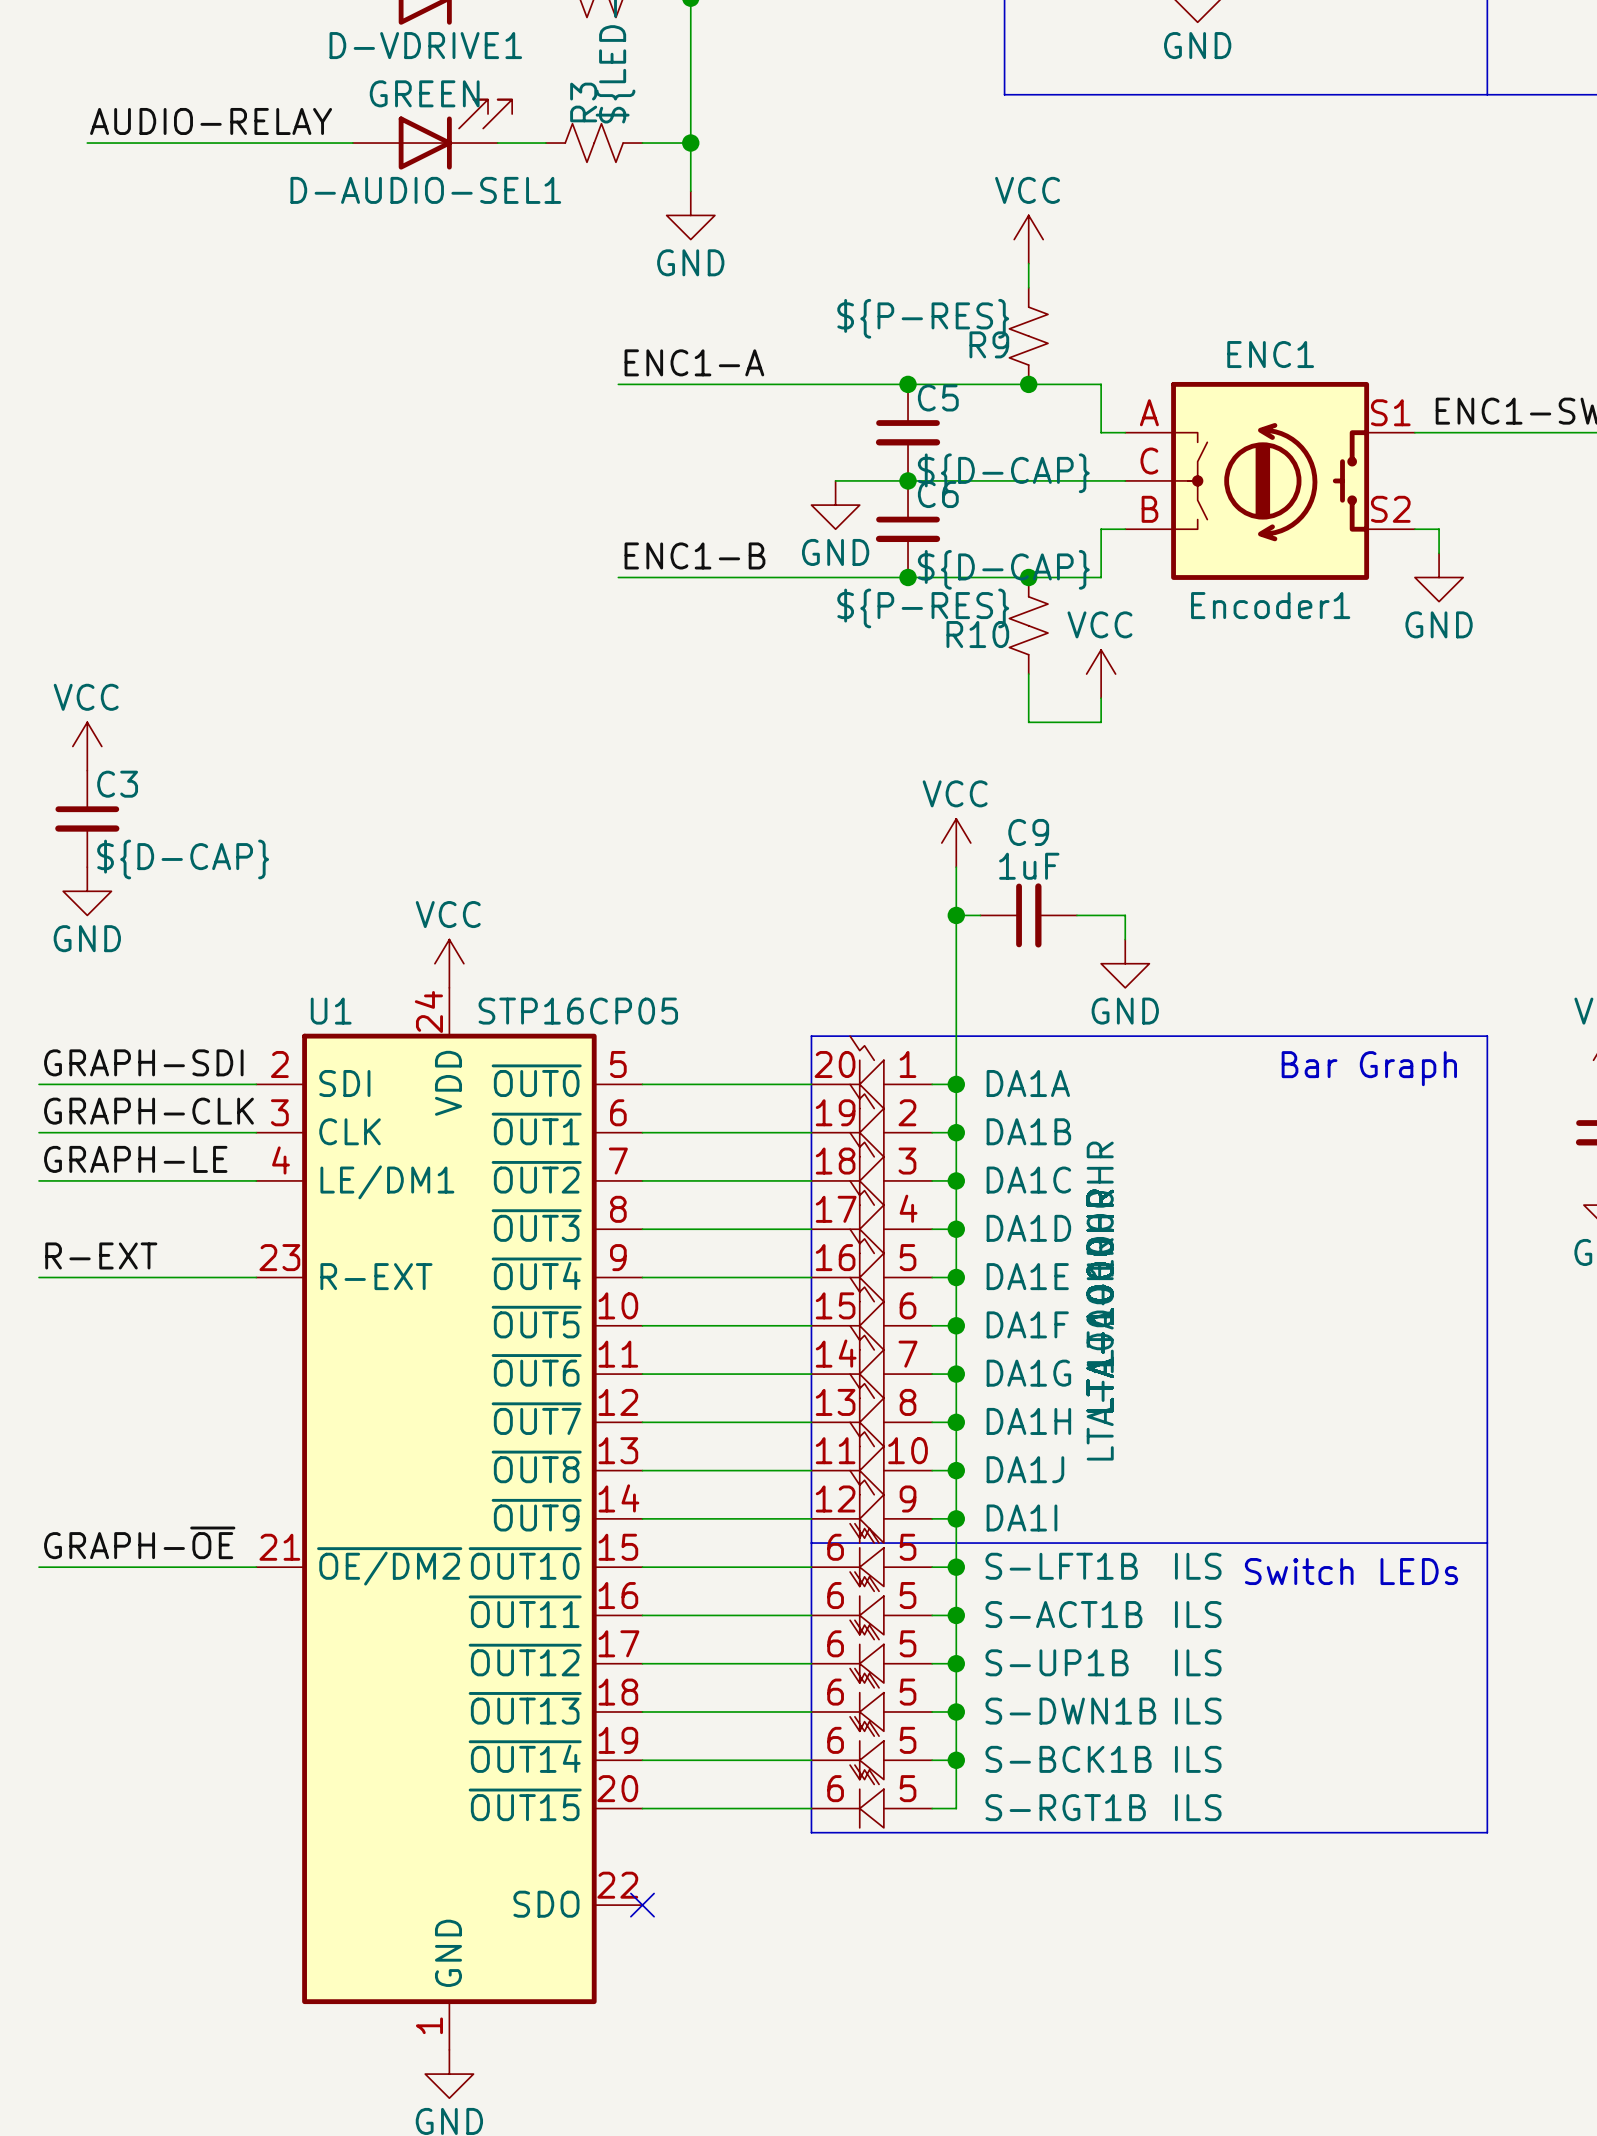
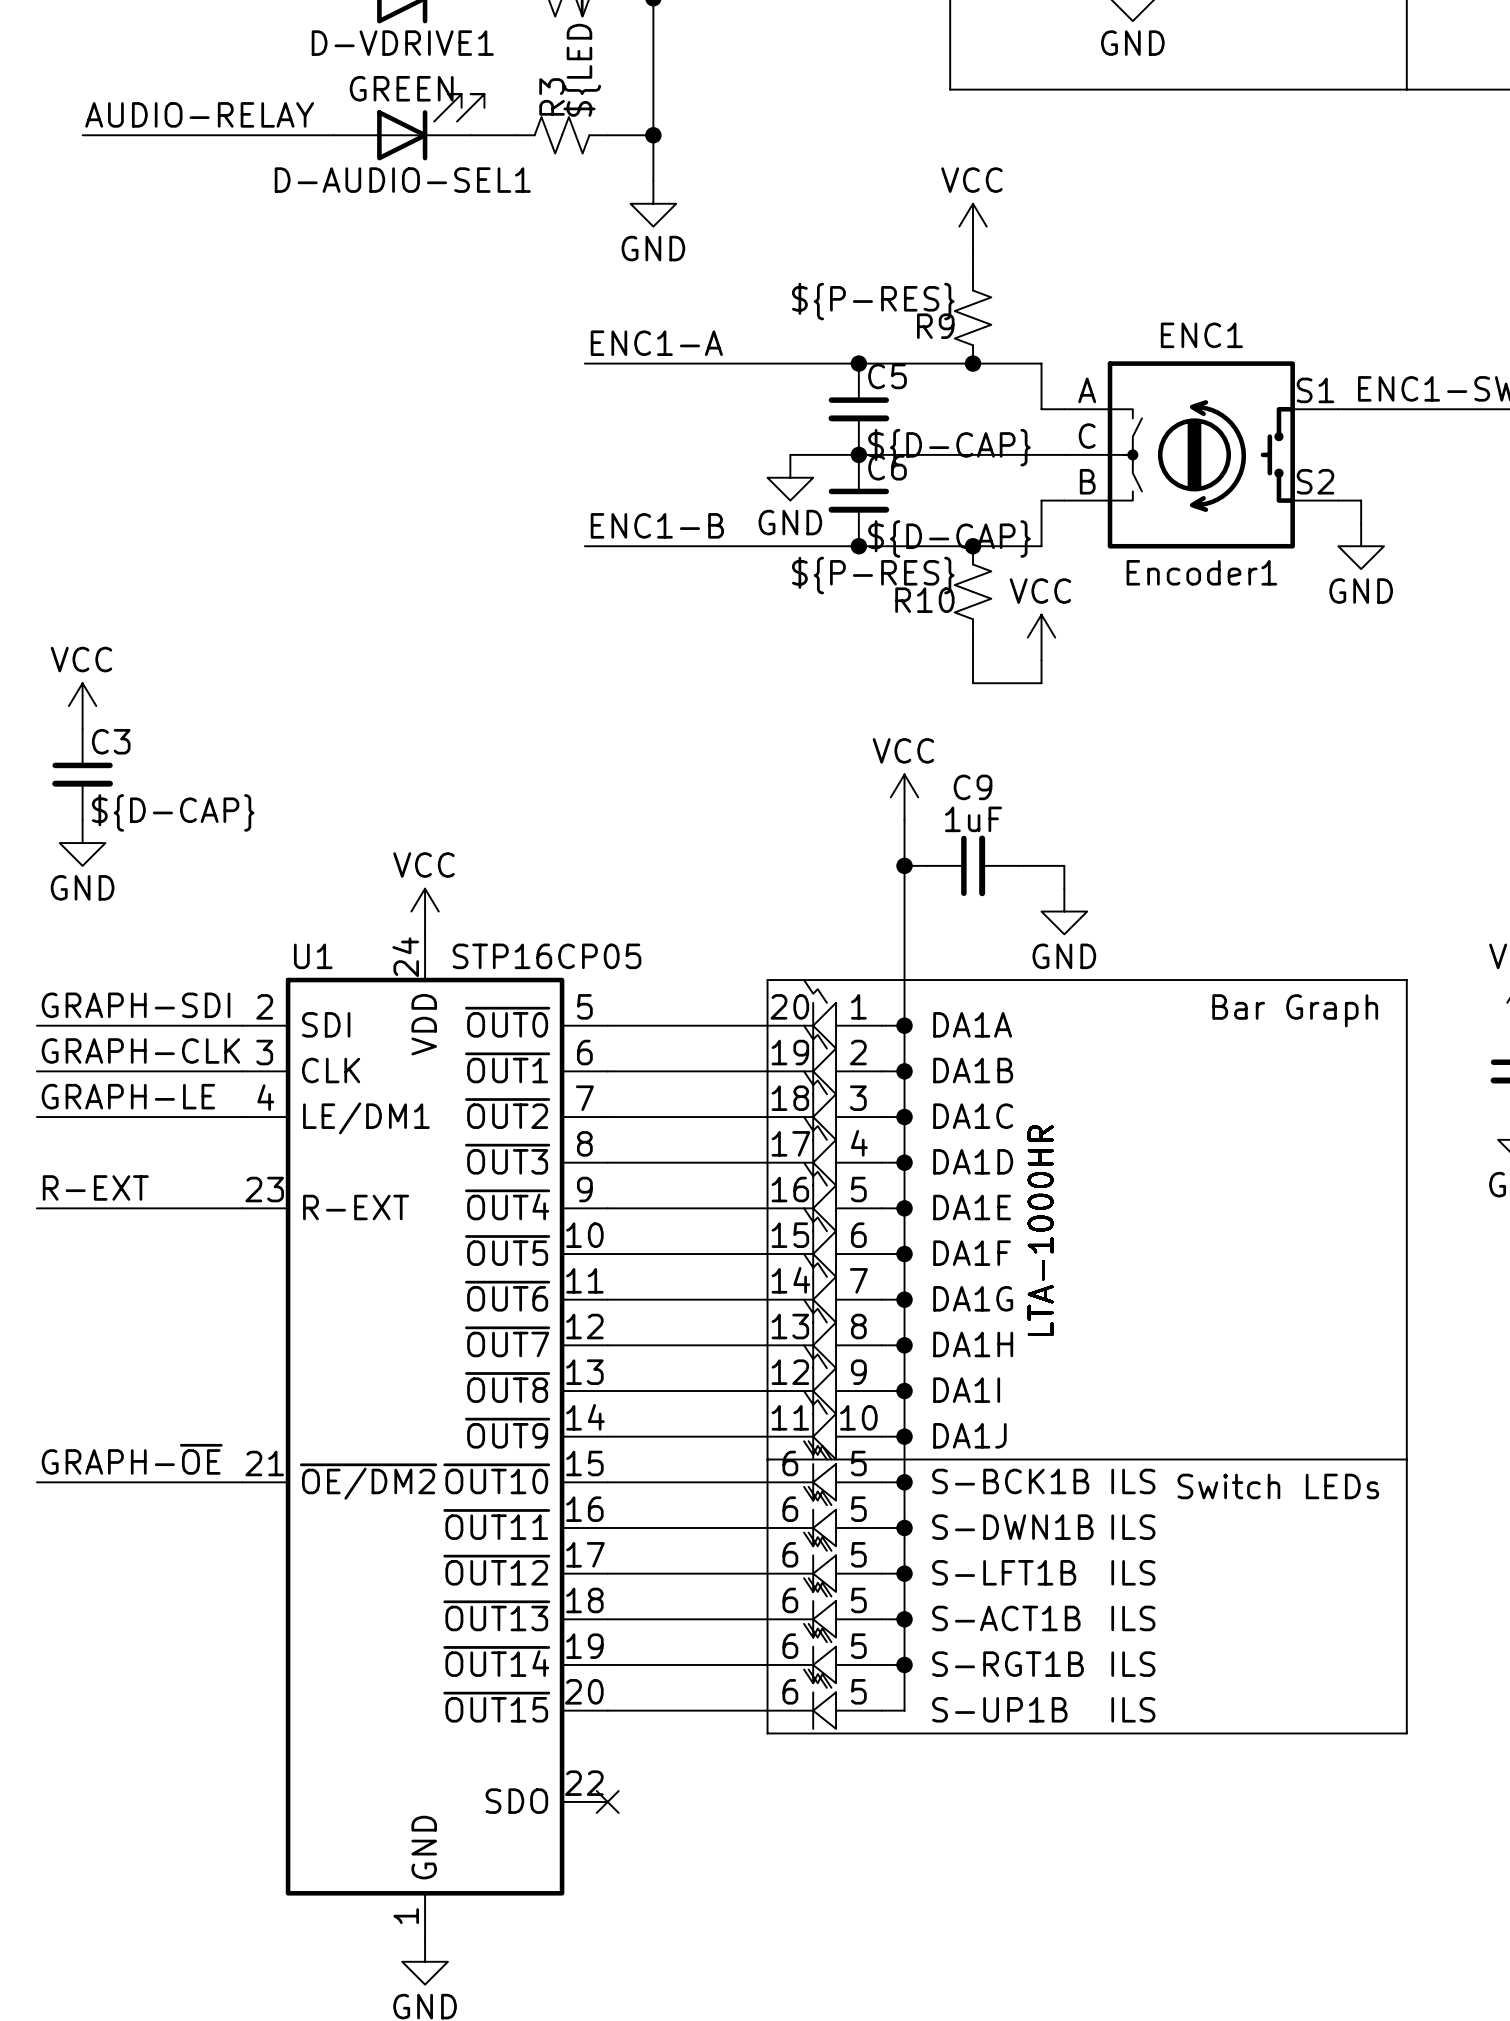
DA1J position: (871, 1458) -> (824, 1425)
DA1I position: (871, 1506) -> (824, 1379)
S-LFT1B name: S-LFT1B (1061, 1566) -> S-BCK1B (1010, 1481)
S-ACT1B name: S-ACT1B (1063, 1614) -> S-DWN1B (1012, 1527)
S-UP1B name: S-UP1B (1057, 1662) -> S-LFT1B (1004, 1572)
S-DWN1B name: S-DWN1B (1070, 1711) -> S-ACT1B (1006, 1618)
S-BCK1B name: S-BCK1B (1068, 1759) -> S-RGT1B (1007, 1664)
S-RGT1B name: S-RGT1B (1065, 1807) -> S-UP1B (999, 1709)

